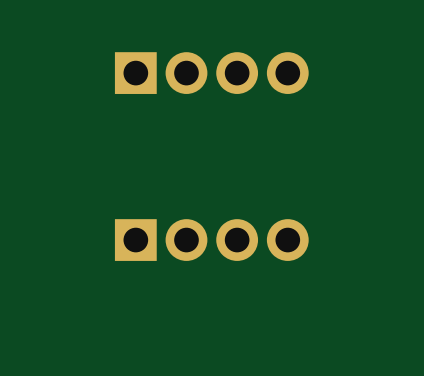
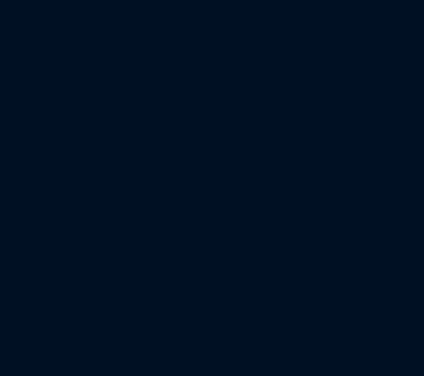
part: (211, 73) -> none
part: (211, 240) -> none

